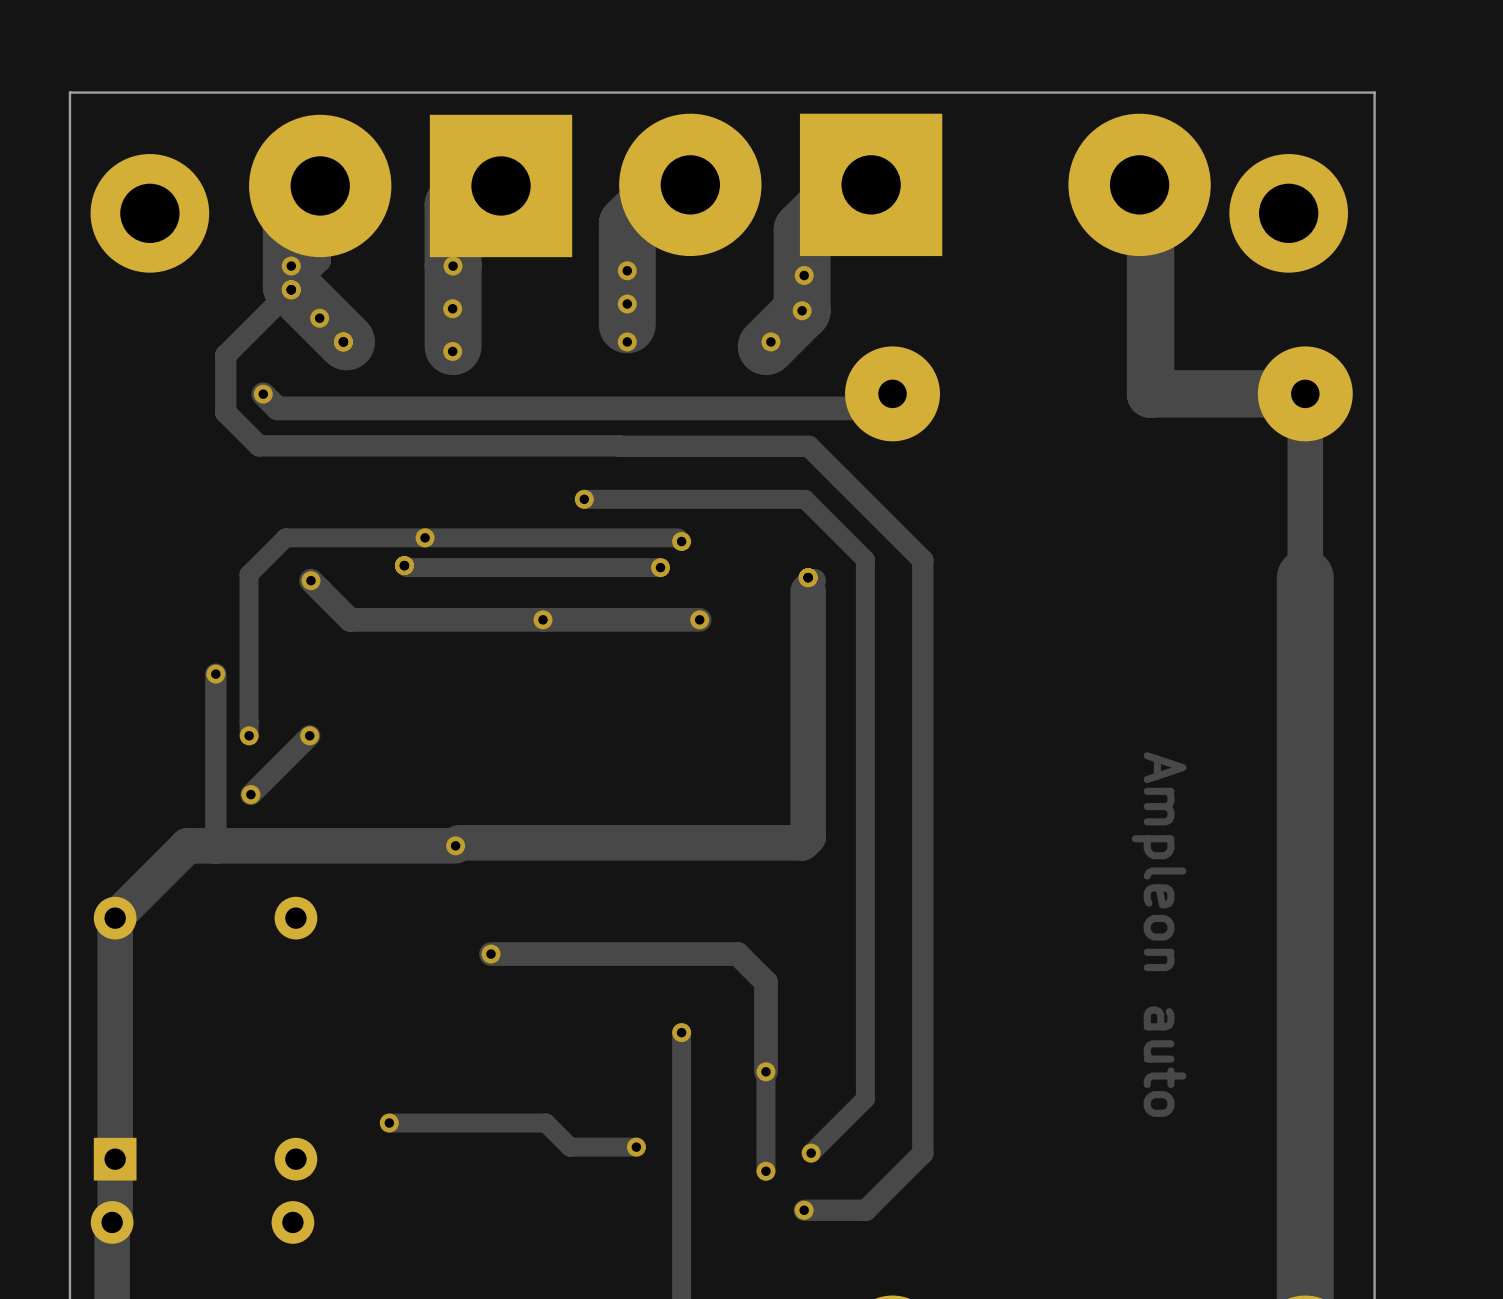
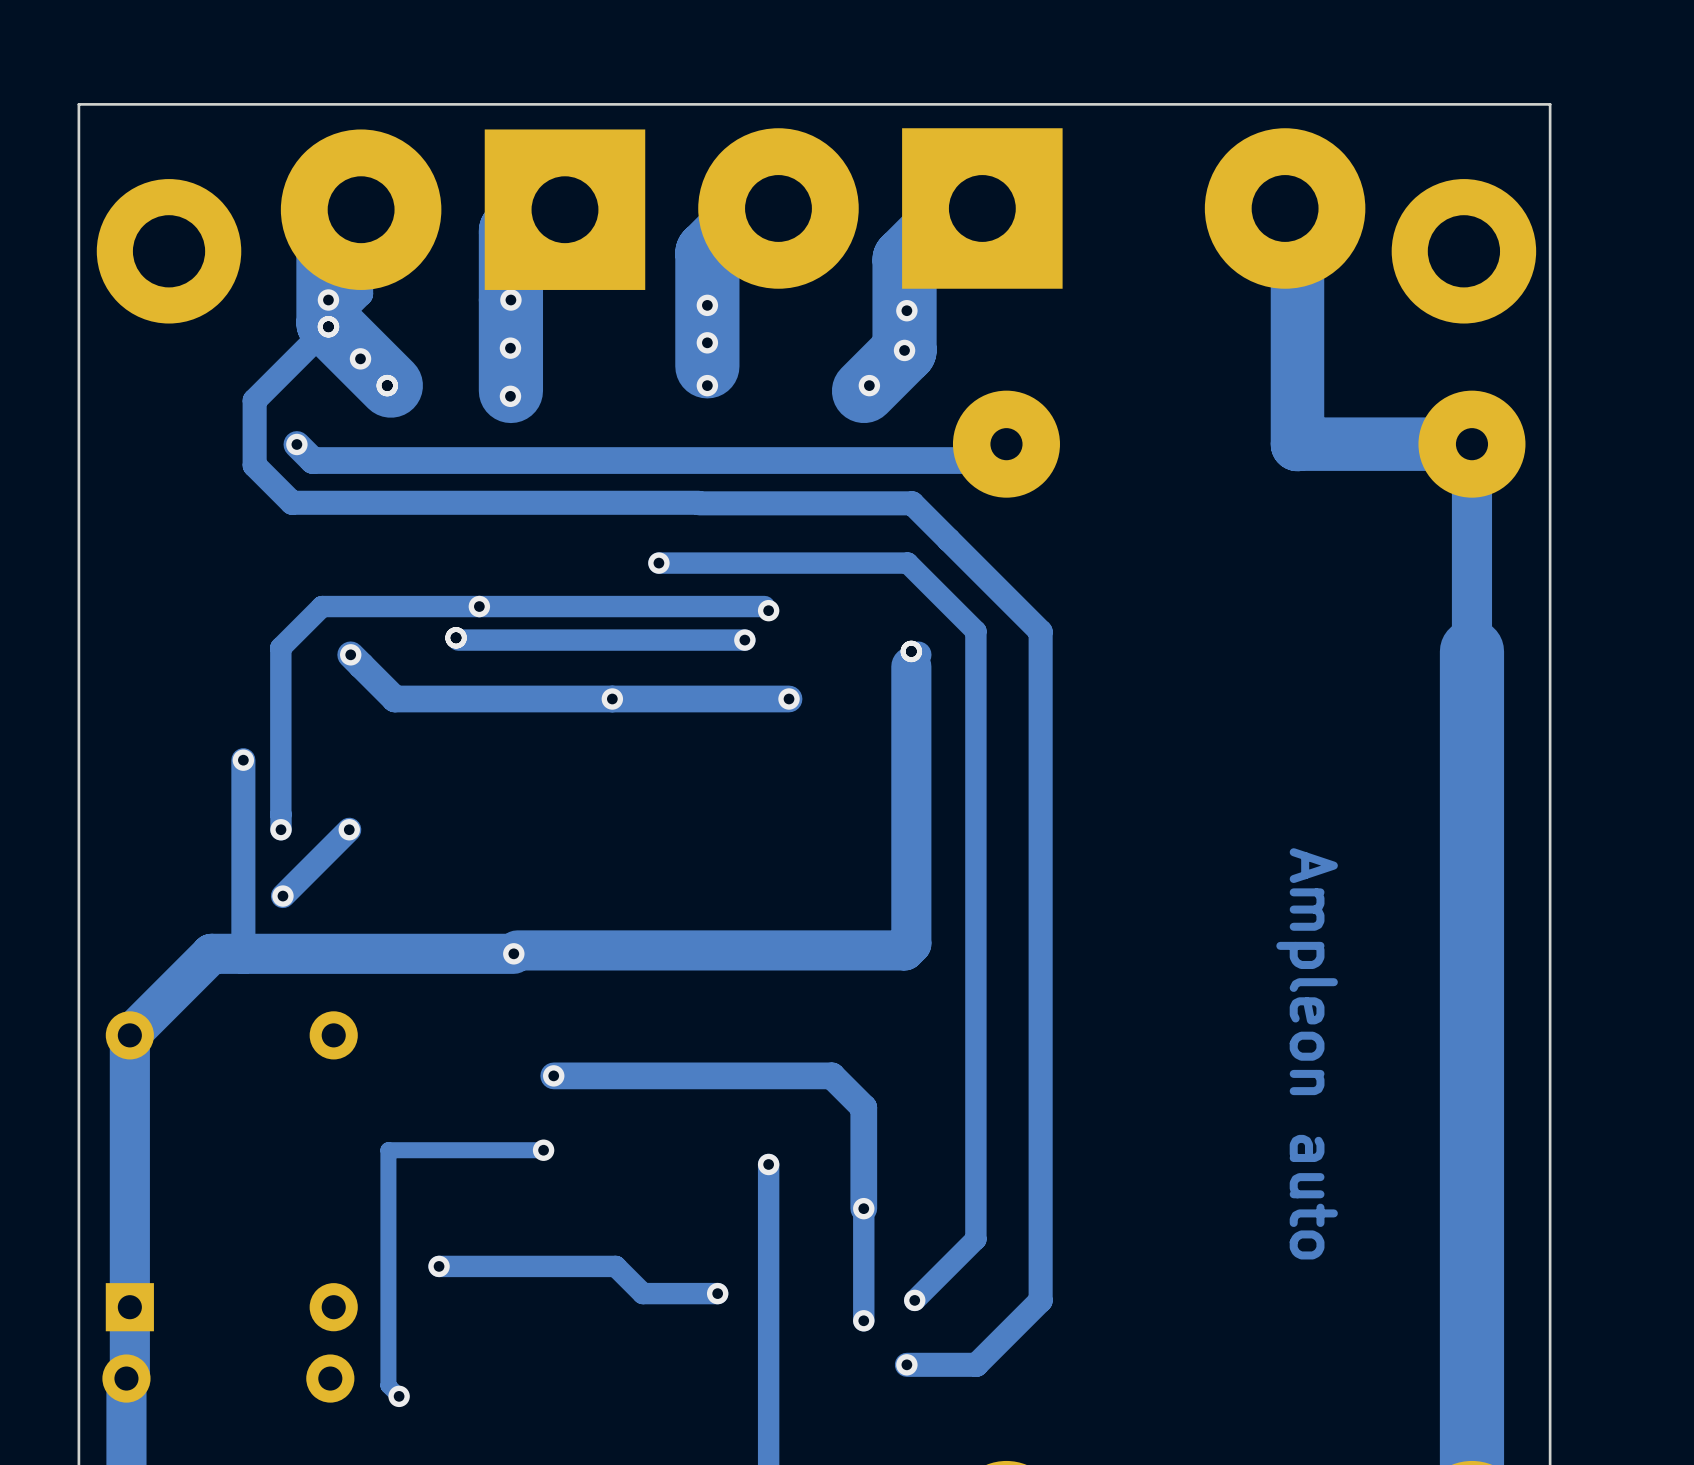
part footprint: [90, 154, 210, 273] -> [96, 179, 242, 324]
part footprint: [1229, 154, 1348, 273] -> [1391, 179, 1537, 324]
track: none -> (543, 1150) (388, 1150) (388, 1385) (399, 1396)
via: none -> (543, 1150)
via: none -> (399, 1396)

